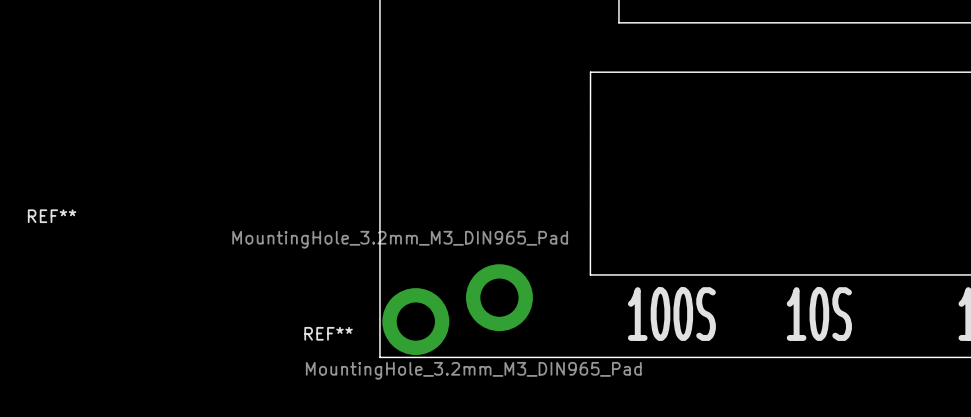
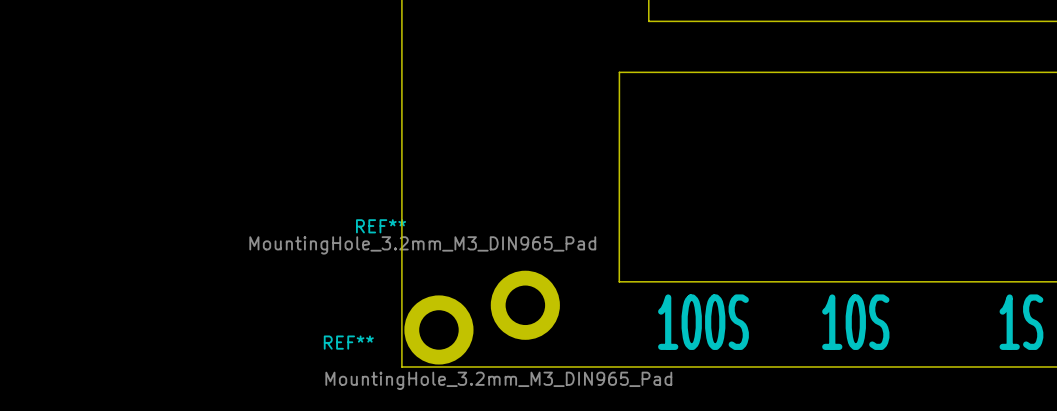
REF** name position: REF** (52, 216) -> REF** (381, 226)

